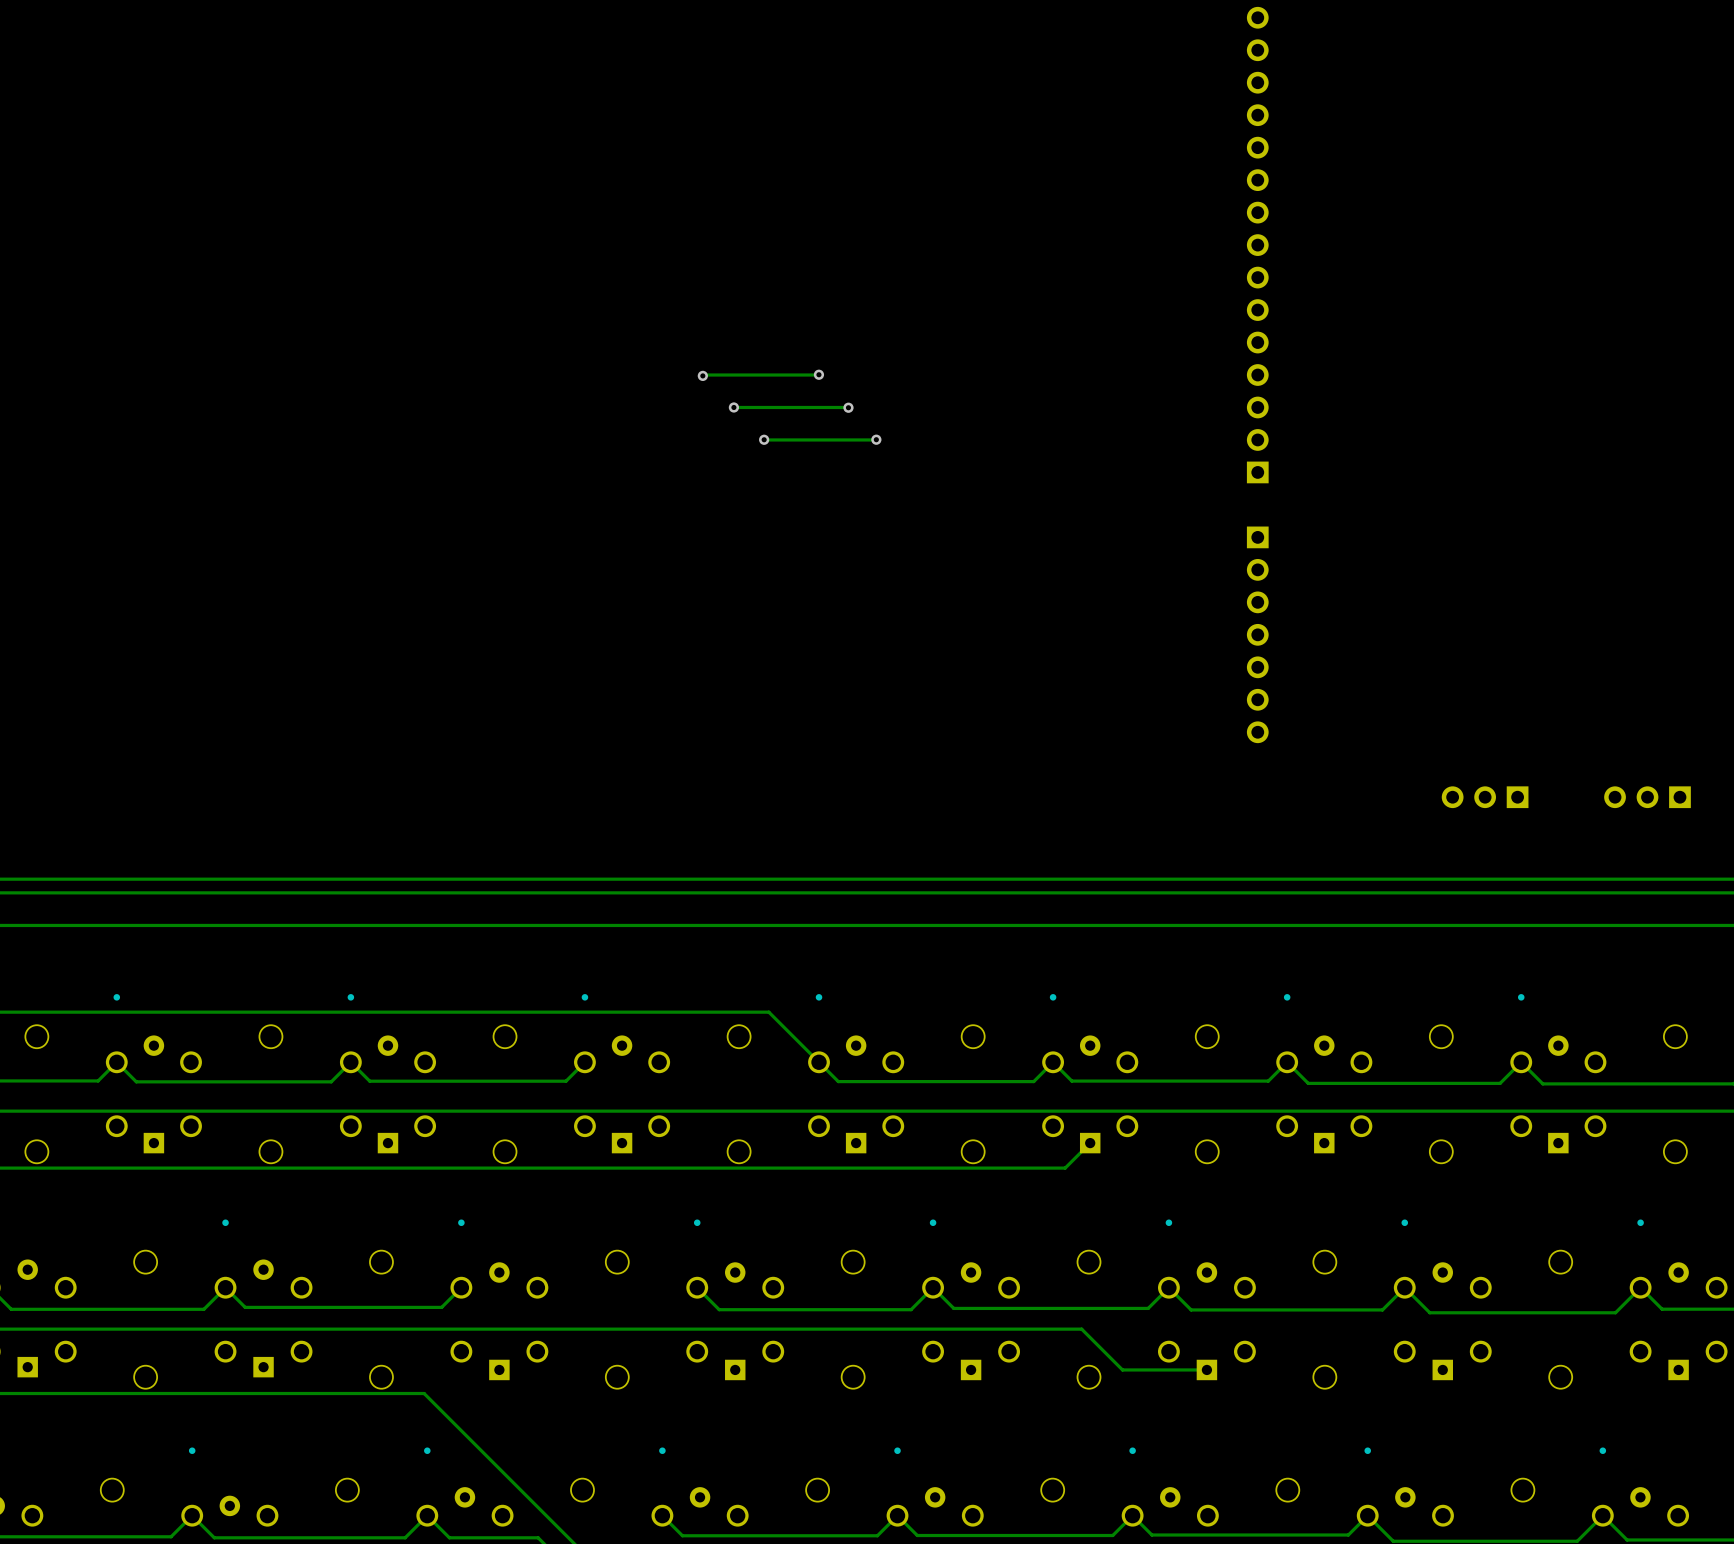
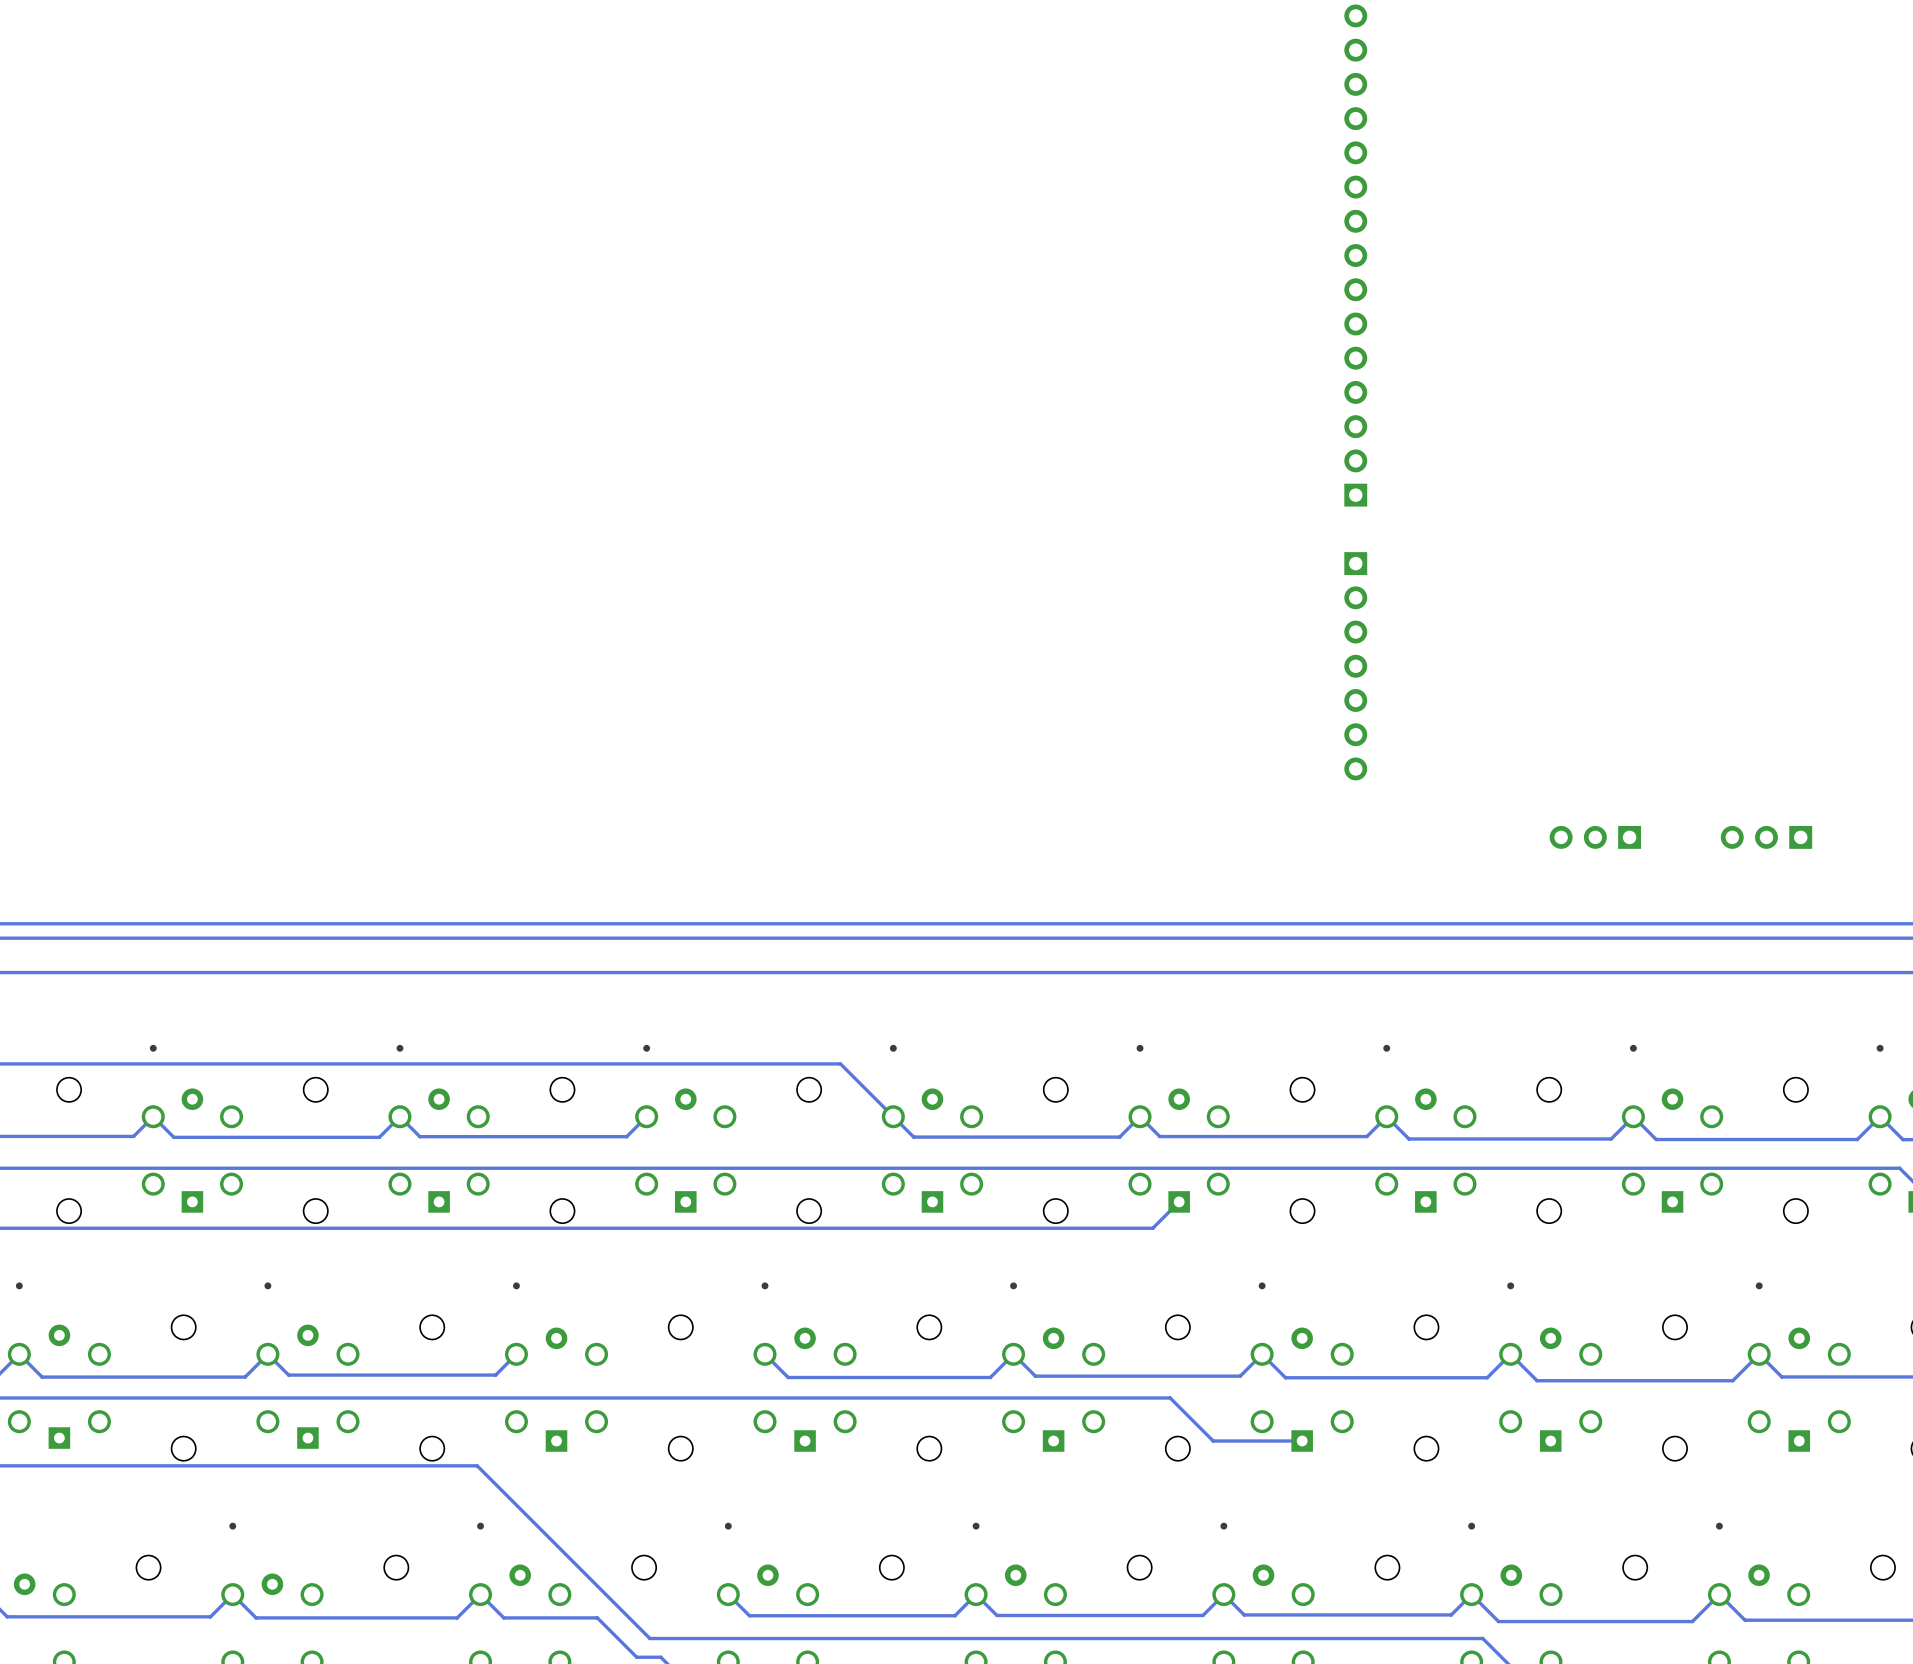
via: (818, 374) -> none
via: (702, 375) -> none
track: (819, 375) (701, 375) -> none
via: (733, 407) -> none
track: (848, 407) (733, 408) -> none
via: (848, 407) -> none
track: (764, 439) (876, 439) -> none
via: (764, 439) -> none
via: (876, 439) -> none

